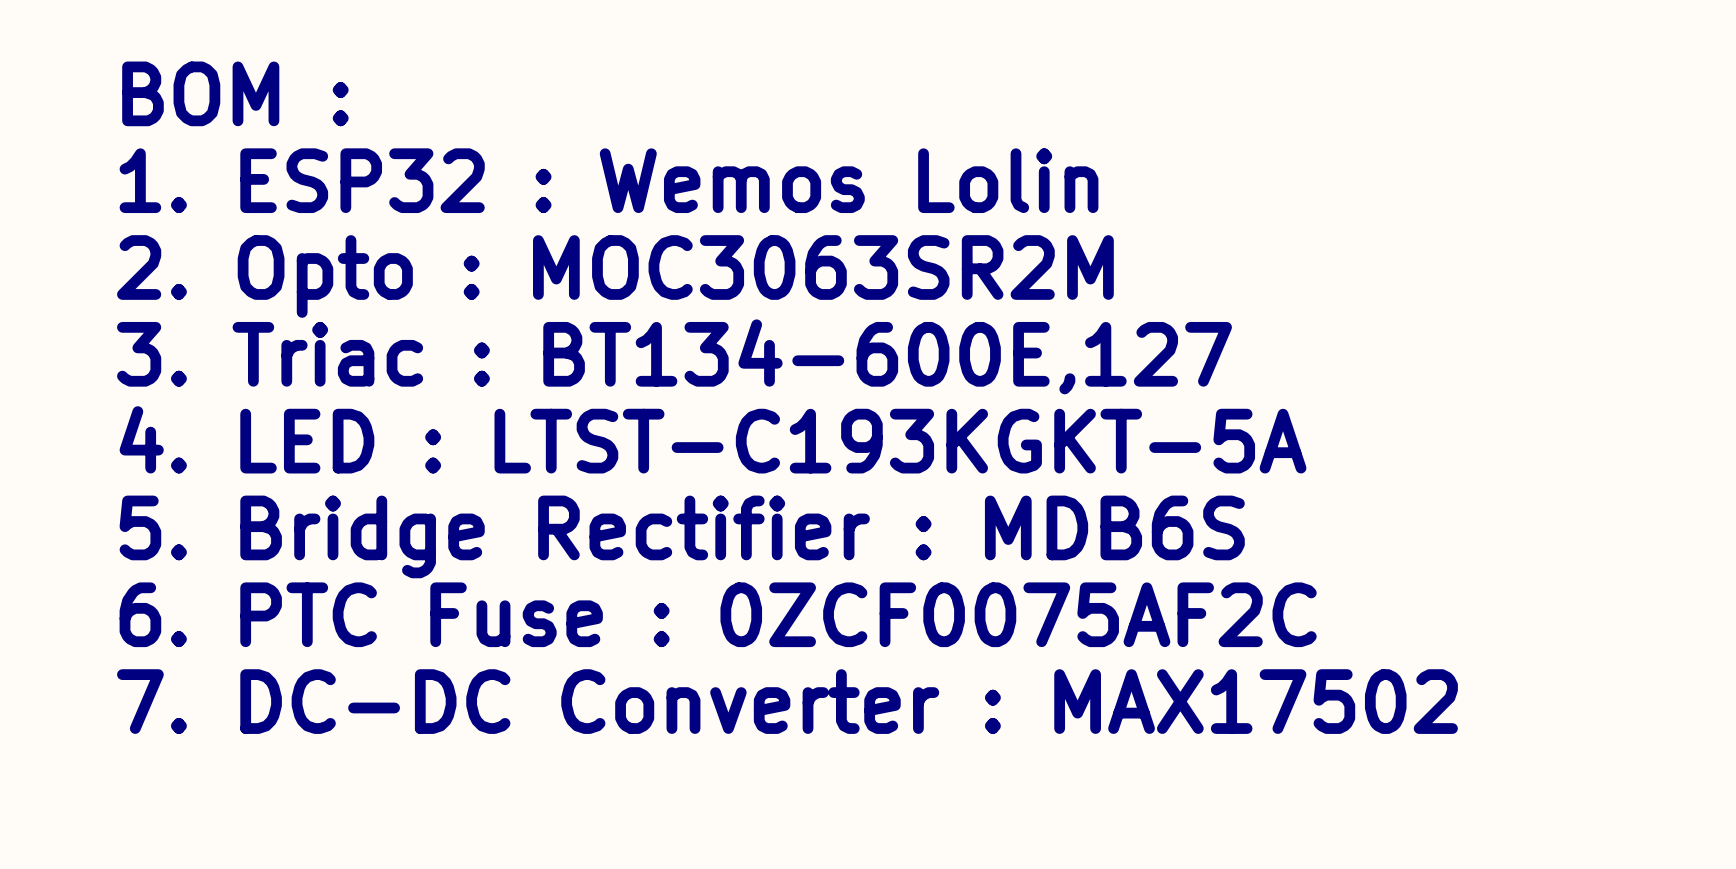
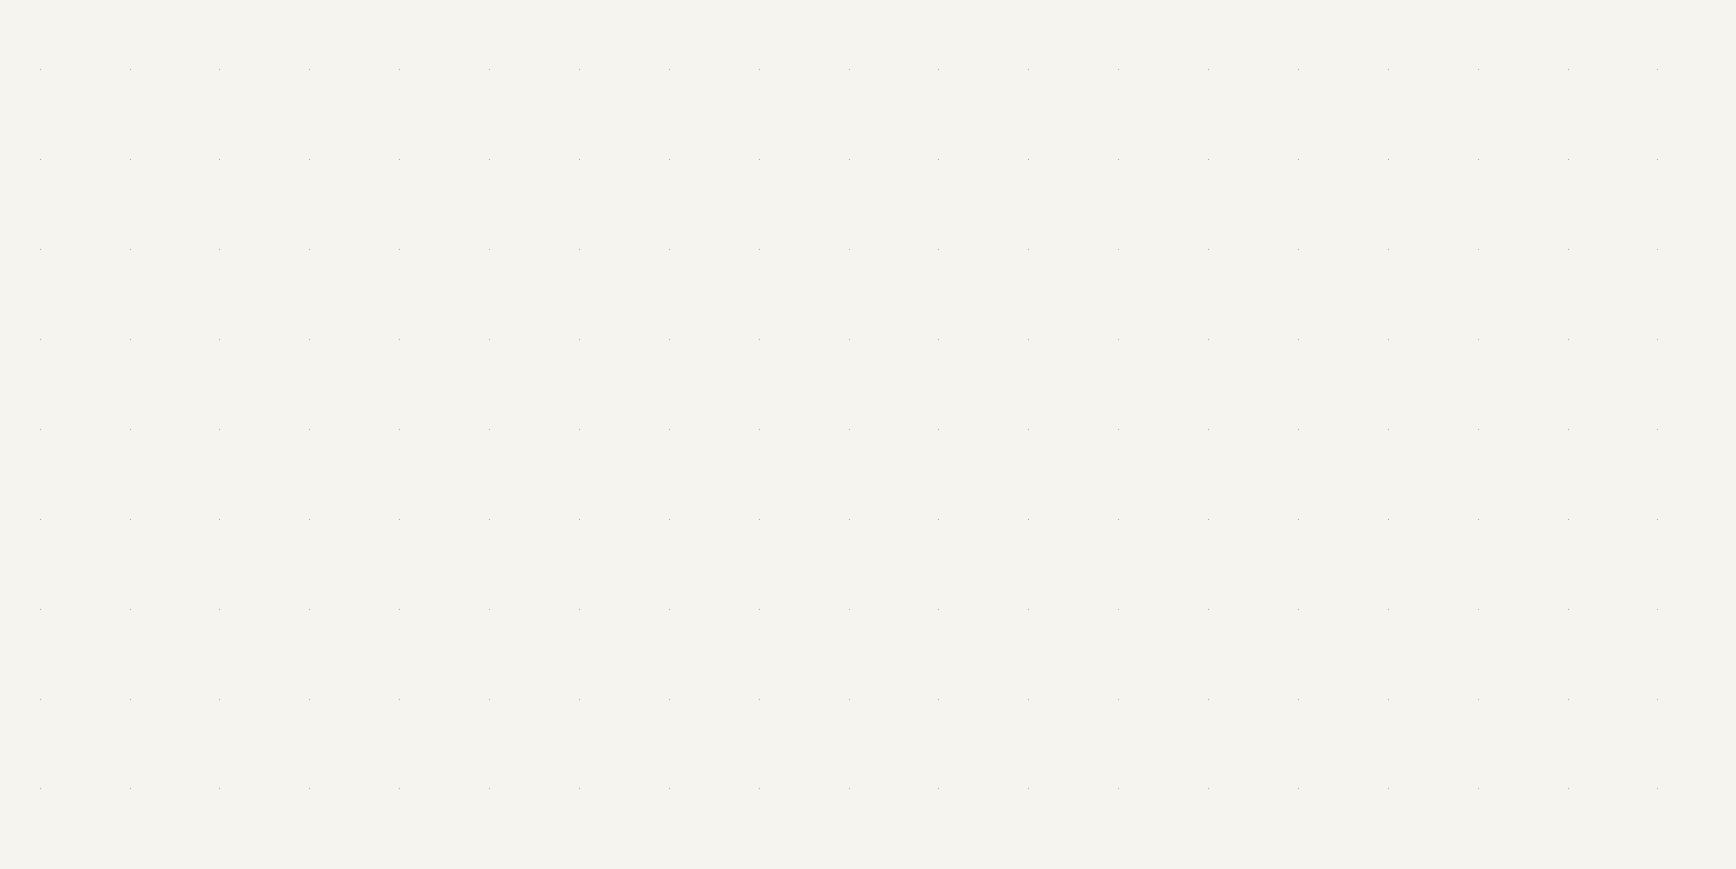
text: BOM : (235, 93) -> none
text: 1. ESP32 : Wemos Lolin (609, 180) -> none
text: 2. Opto : MOC3063SR2M (615, 276) -> none
text: 3. Triac : BT134-600E,127 (674, 356) -> none
text: 4. LED : LTST-C193KGKT-5A (713, 439) -> none
text: 5. Bridge Rectifier : MDB6S (682, 536) -> none
text: 6. PTC Fuse : 0ZCF0075AF2C (718, 614) -> none
text: 7. DC-DC Converter : MAX17502 (787, 701) -> none

